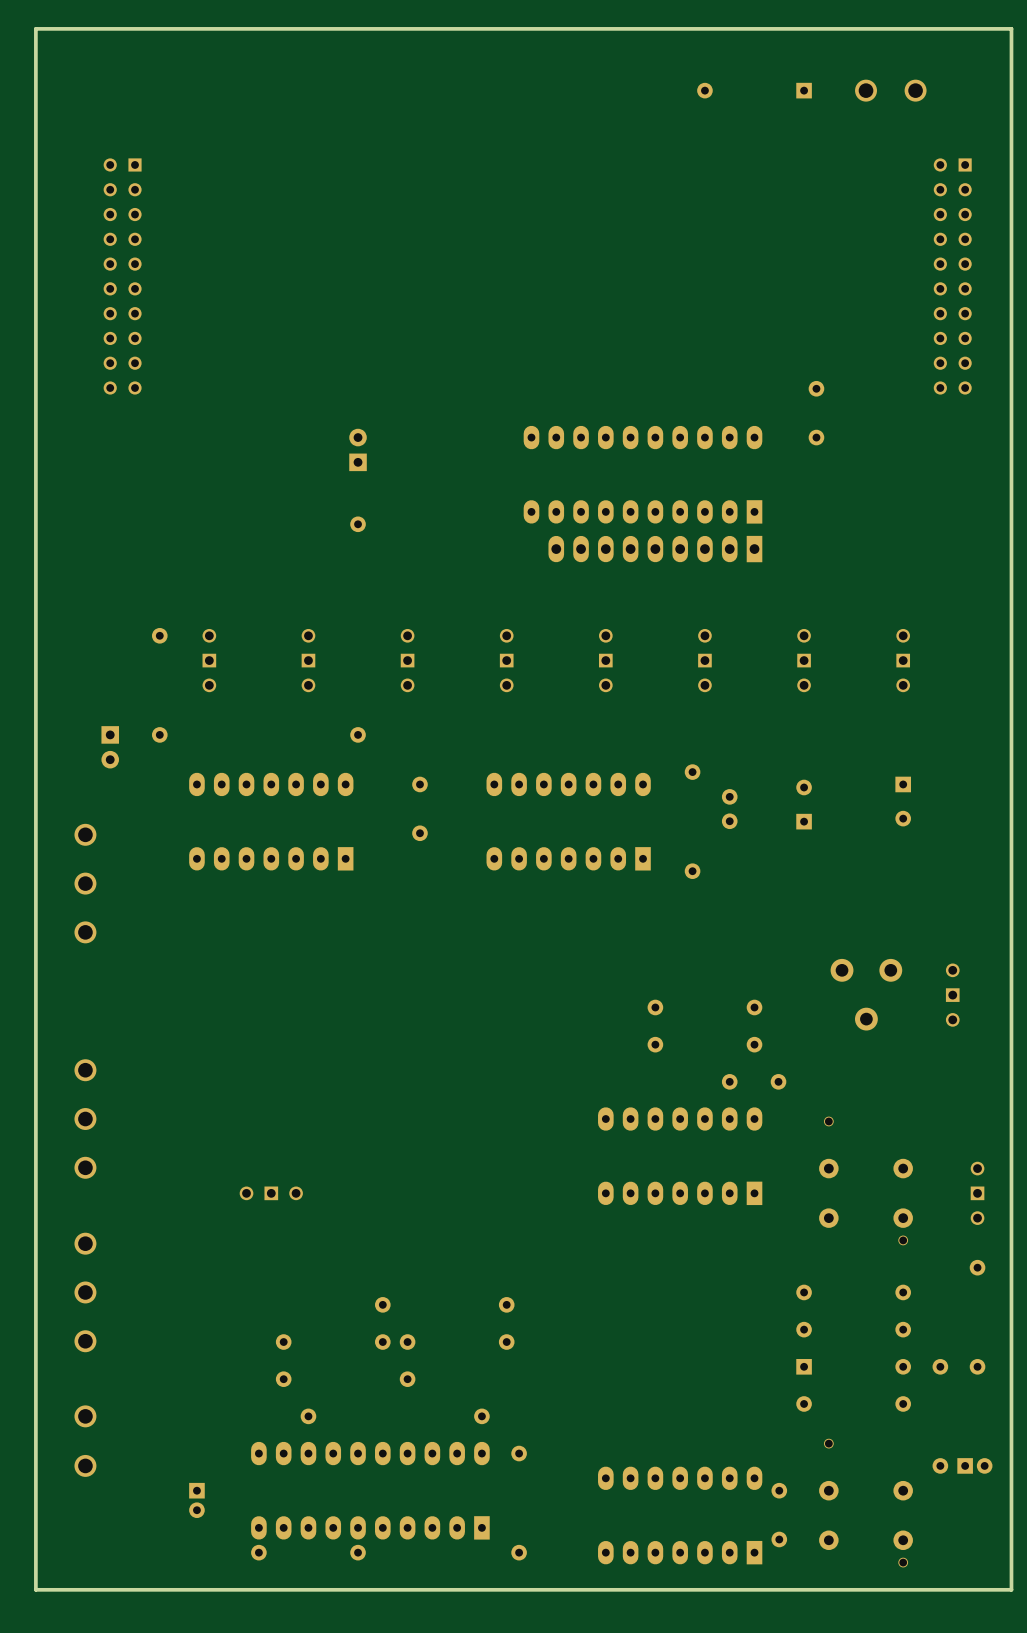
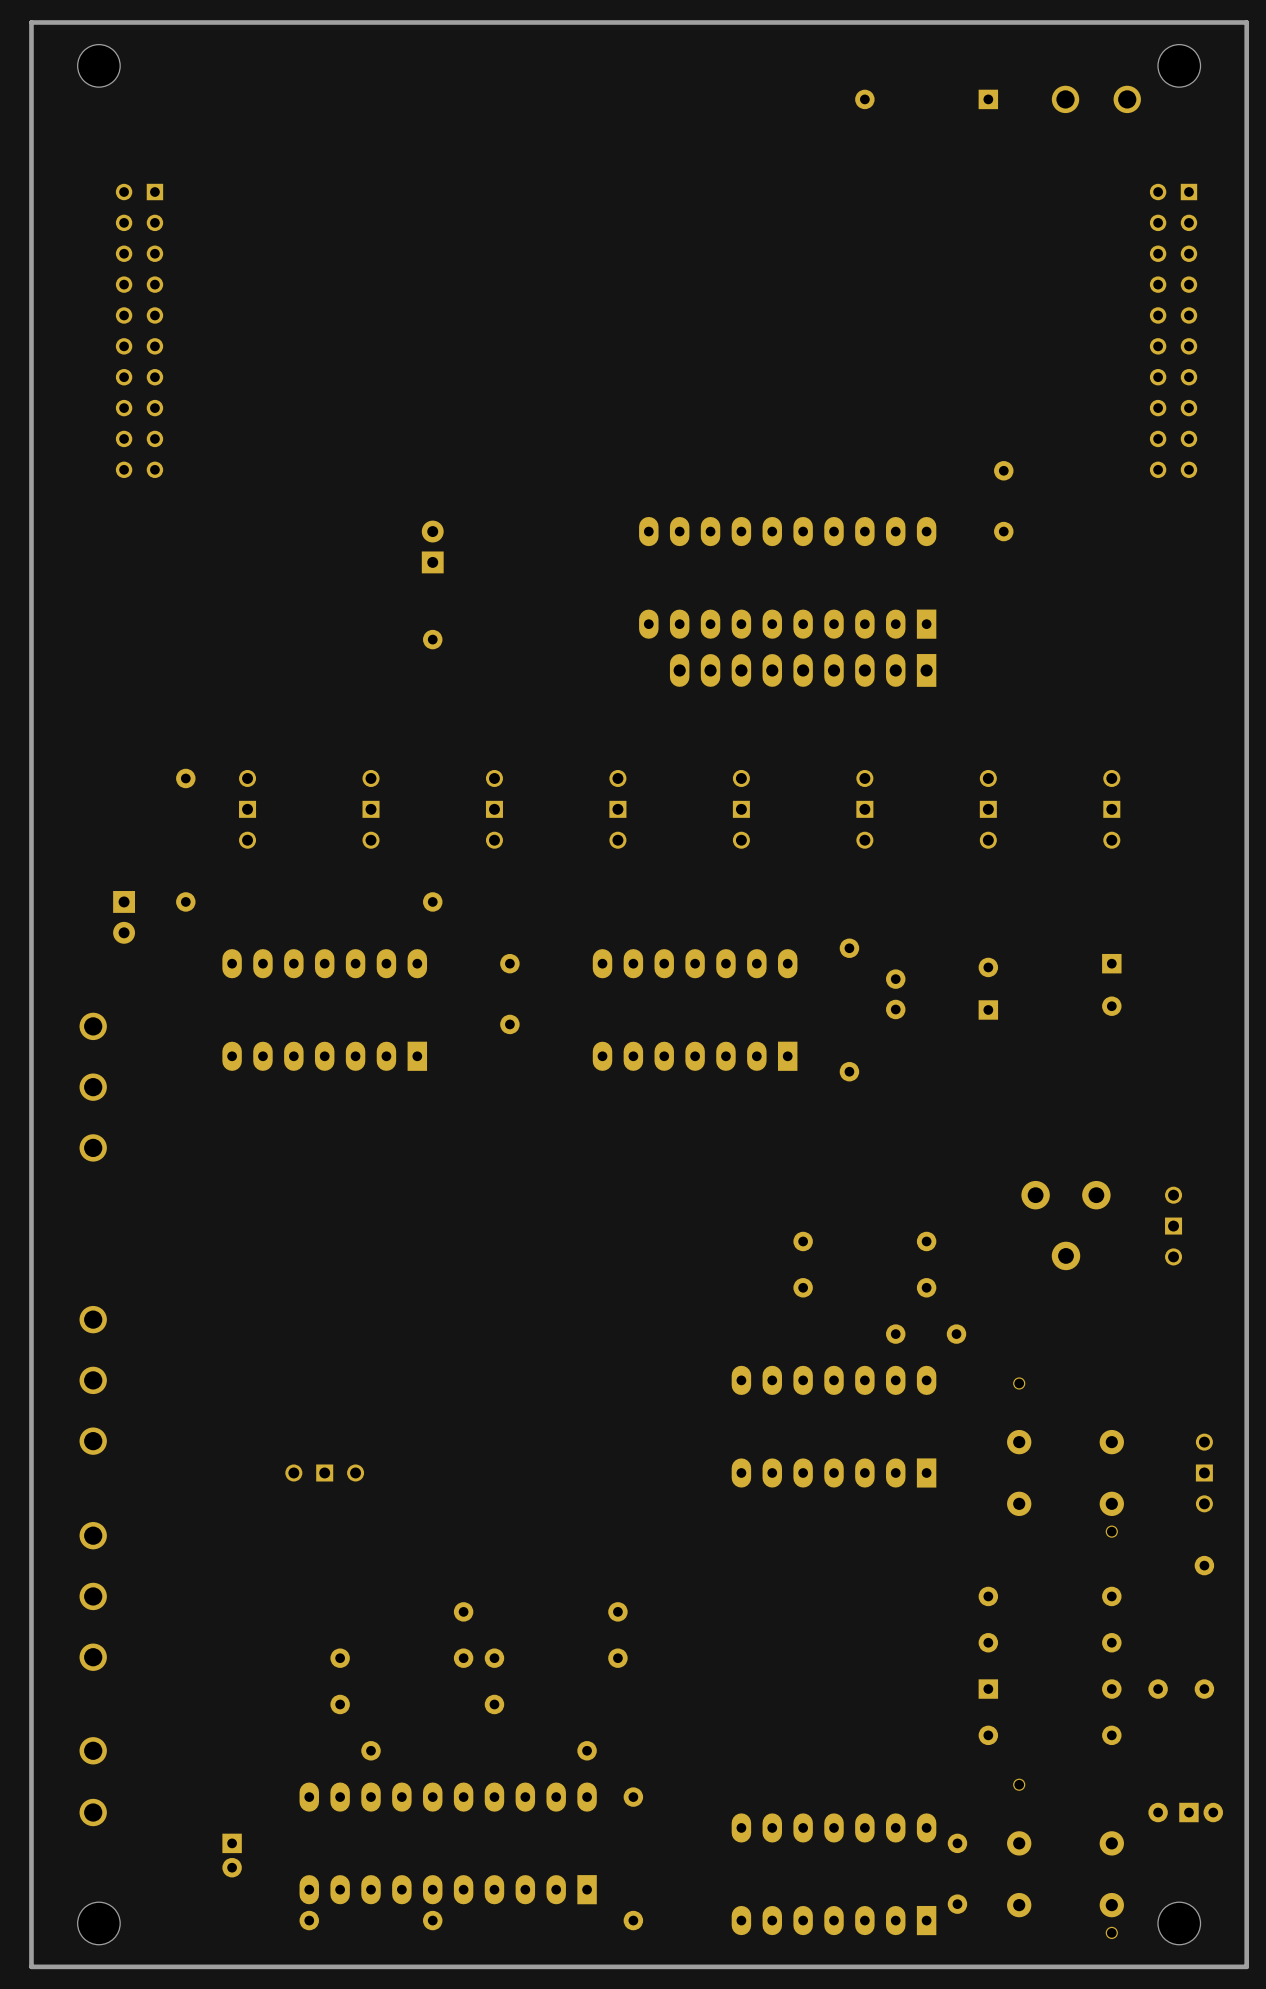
part: none -> (639, 994)

